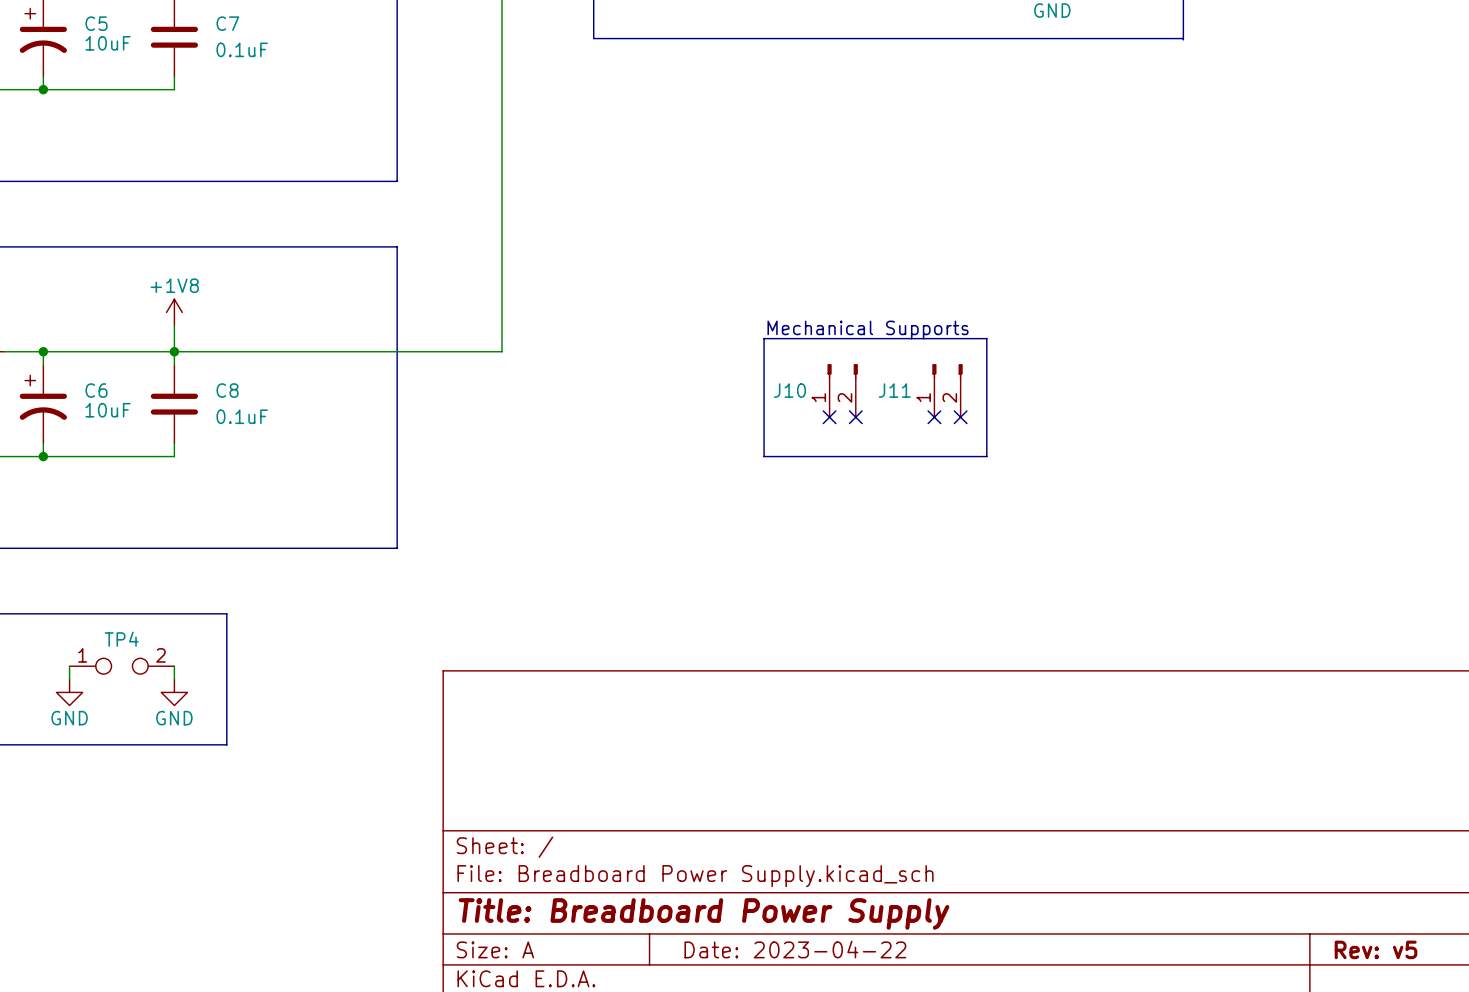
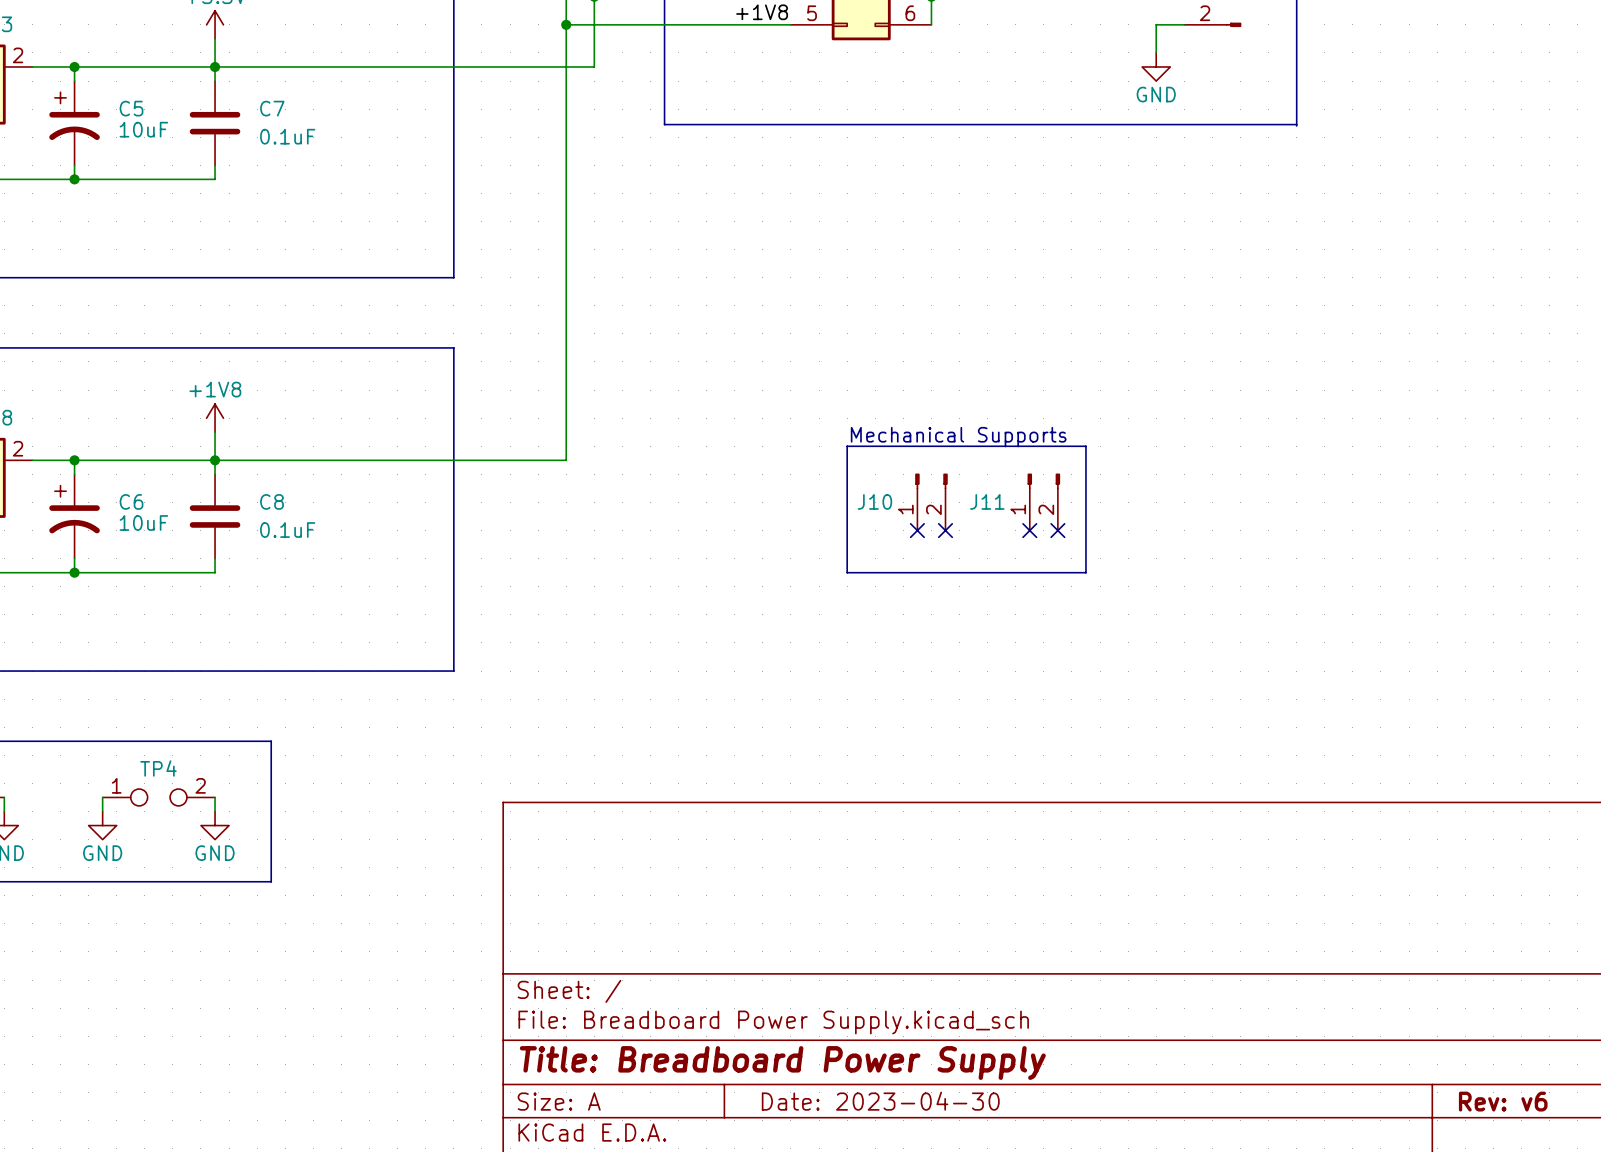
title block: Date: 2023-04-22 (795, 949) -> Date: 2023-04-30 (880, 1101)
title block: Rev: v5 (1376, 949) -> Rev: v6 (1503, 1101)

